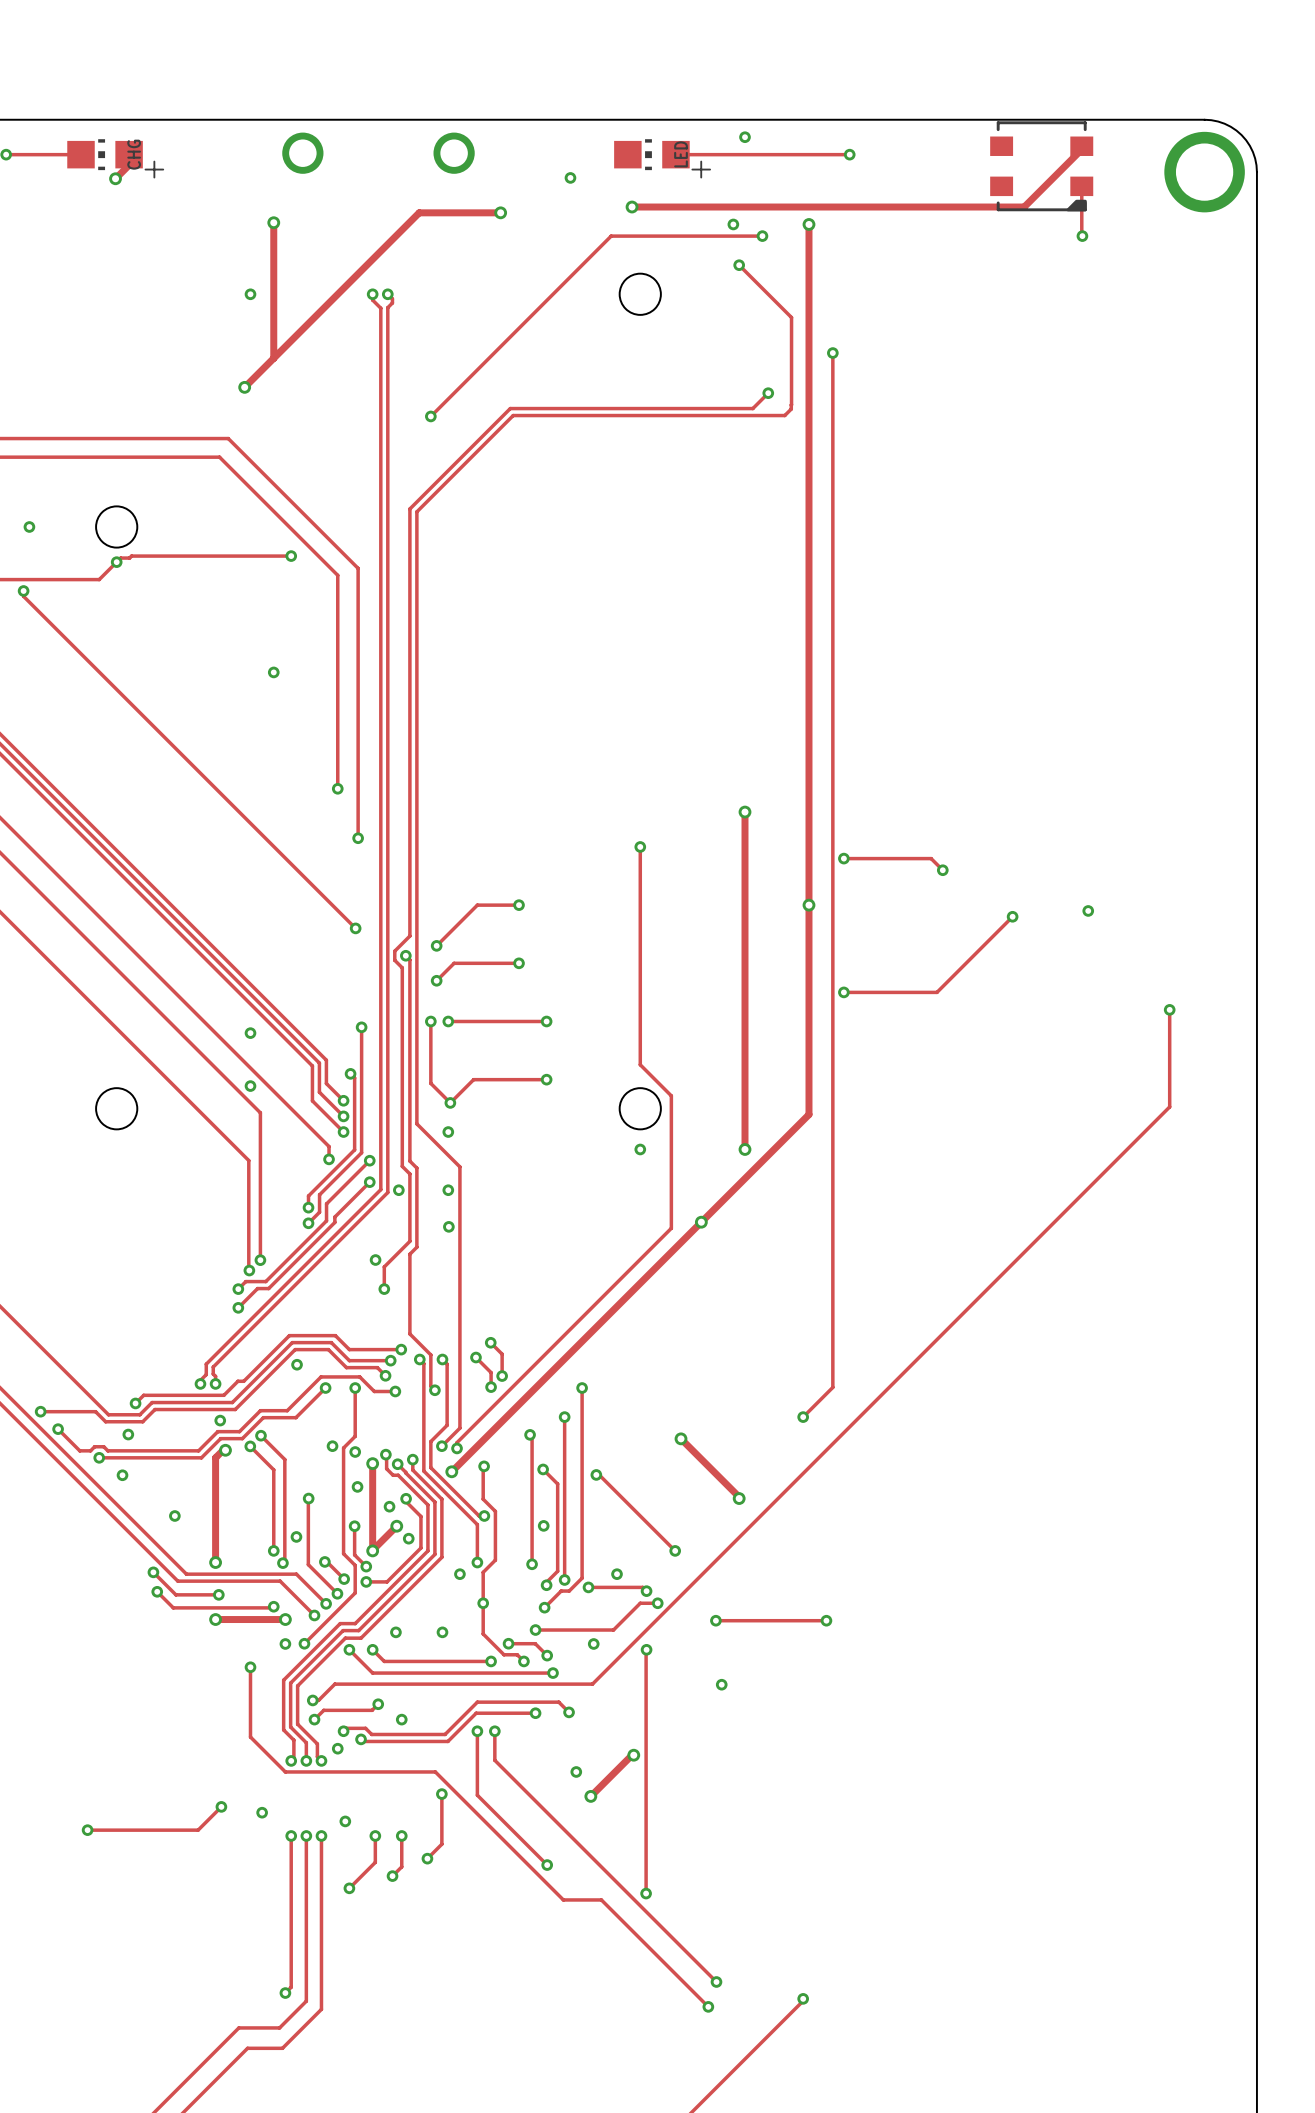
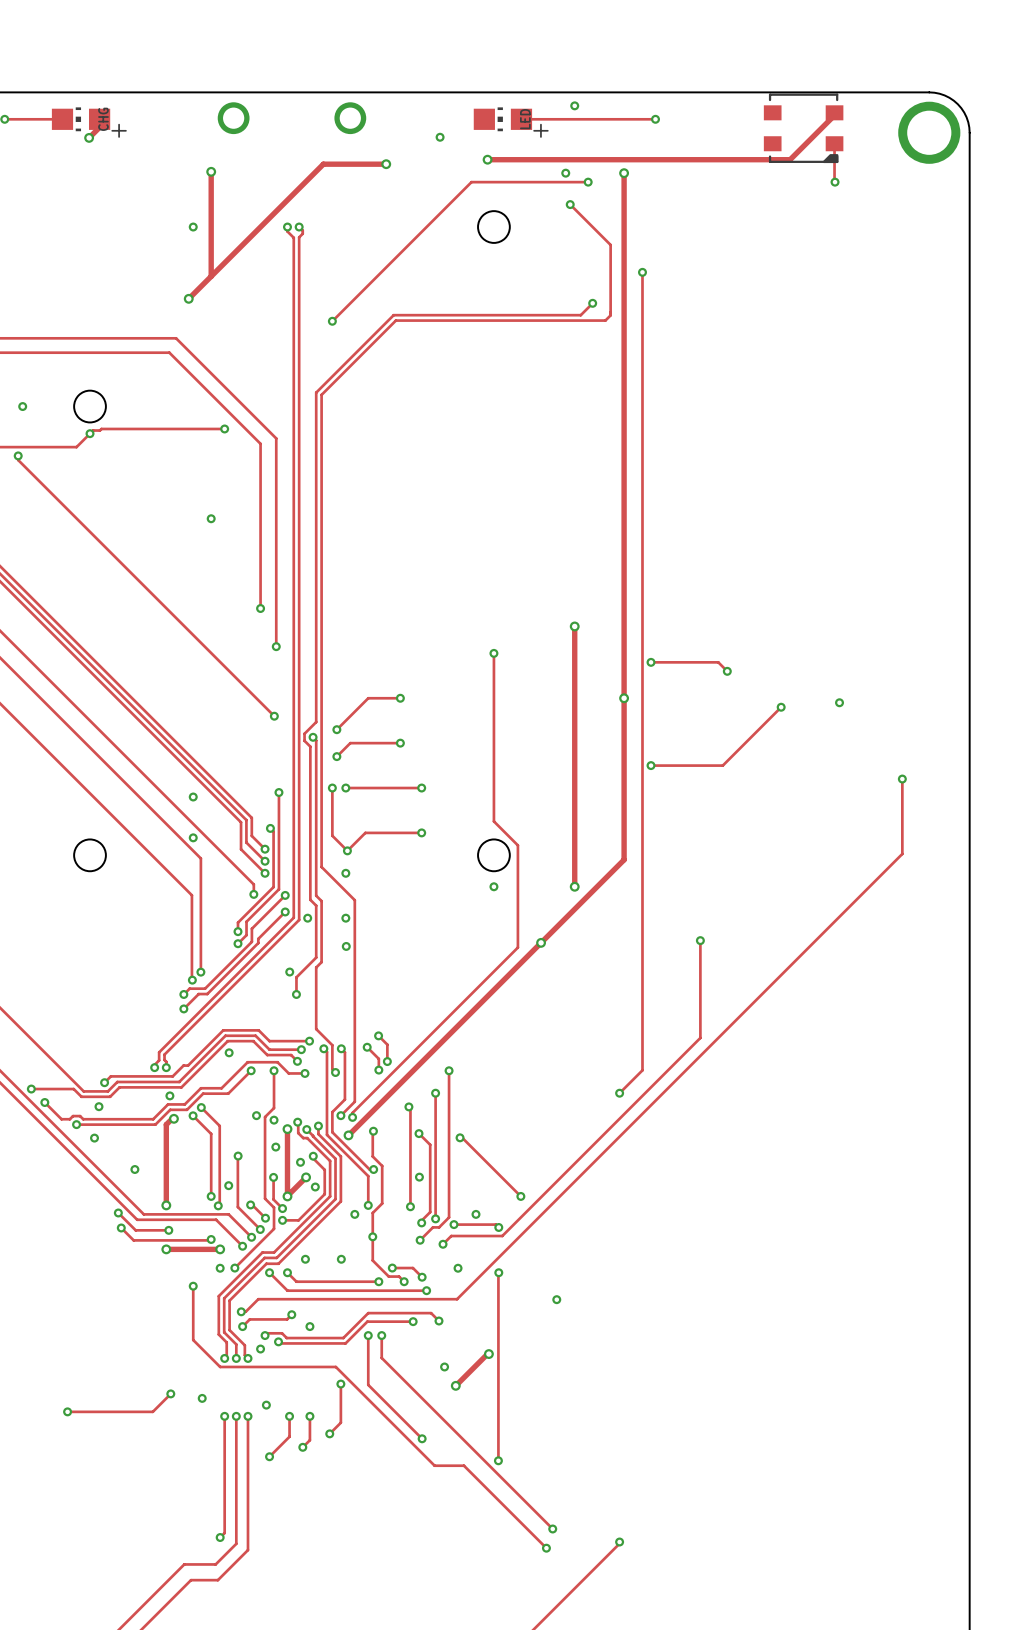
track: none -> (700, 940) (700, 1037) (502, 1236) (451, 1236) (443, 1244)
via: none -> (700, 940)
track: (681, 1438) (739, 1498) -> none
via: (681, 1438) -> none
via: (739, 1498) -> none
track: (657, 1603) (640, 1603) (613, 1630) (535, 1630) -> none
via: (657, 1603) -> none
via: none -> (443, 1244)
track: (715, 1620) (826, 1620) -> none
via: (715, 1620) -> none
via: (826, 1620) -> none
via: (535, 1630) -> none

